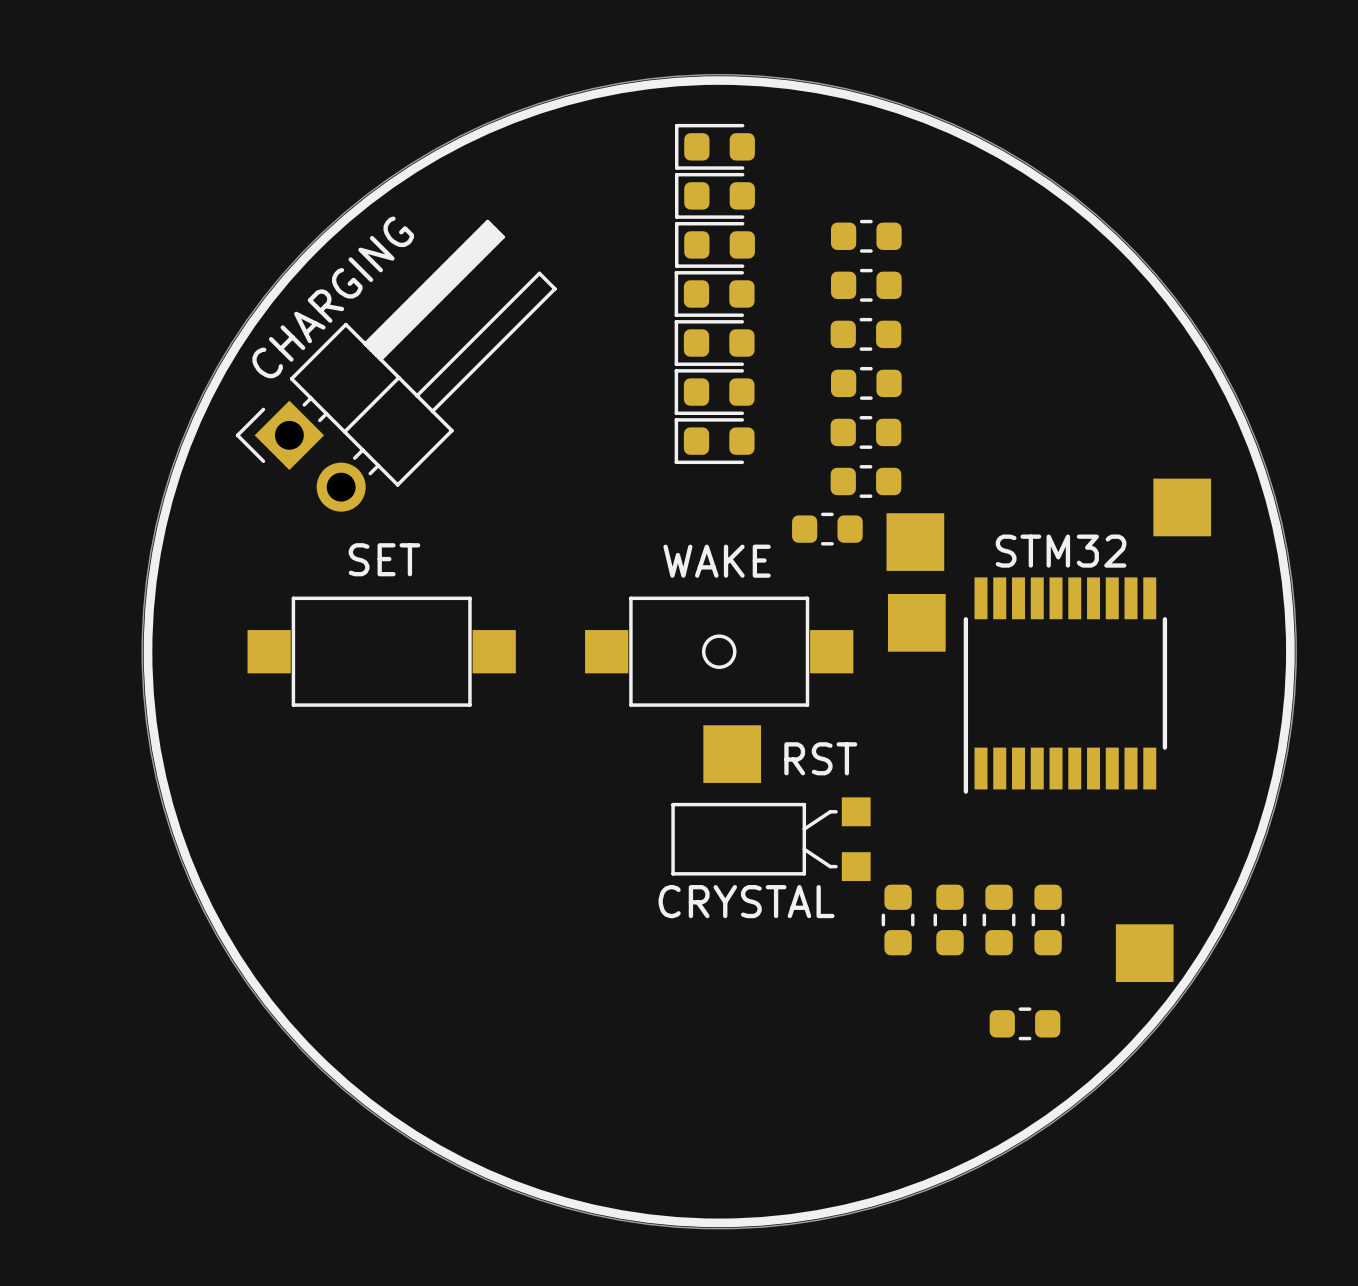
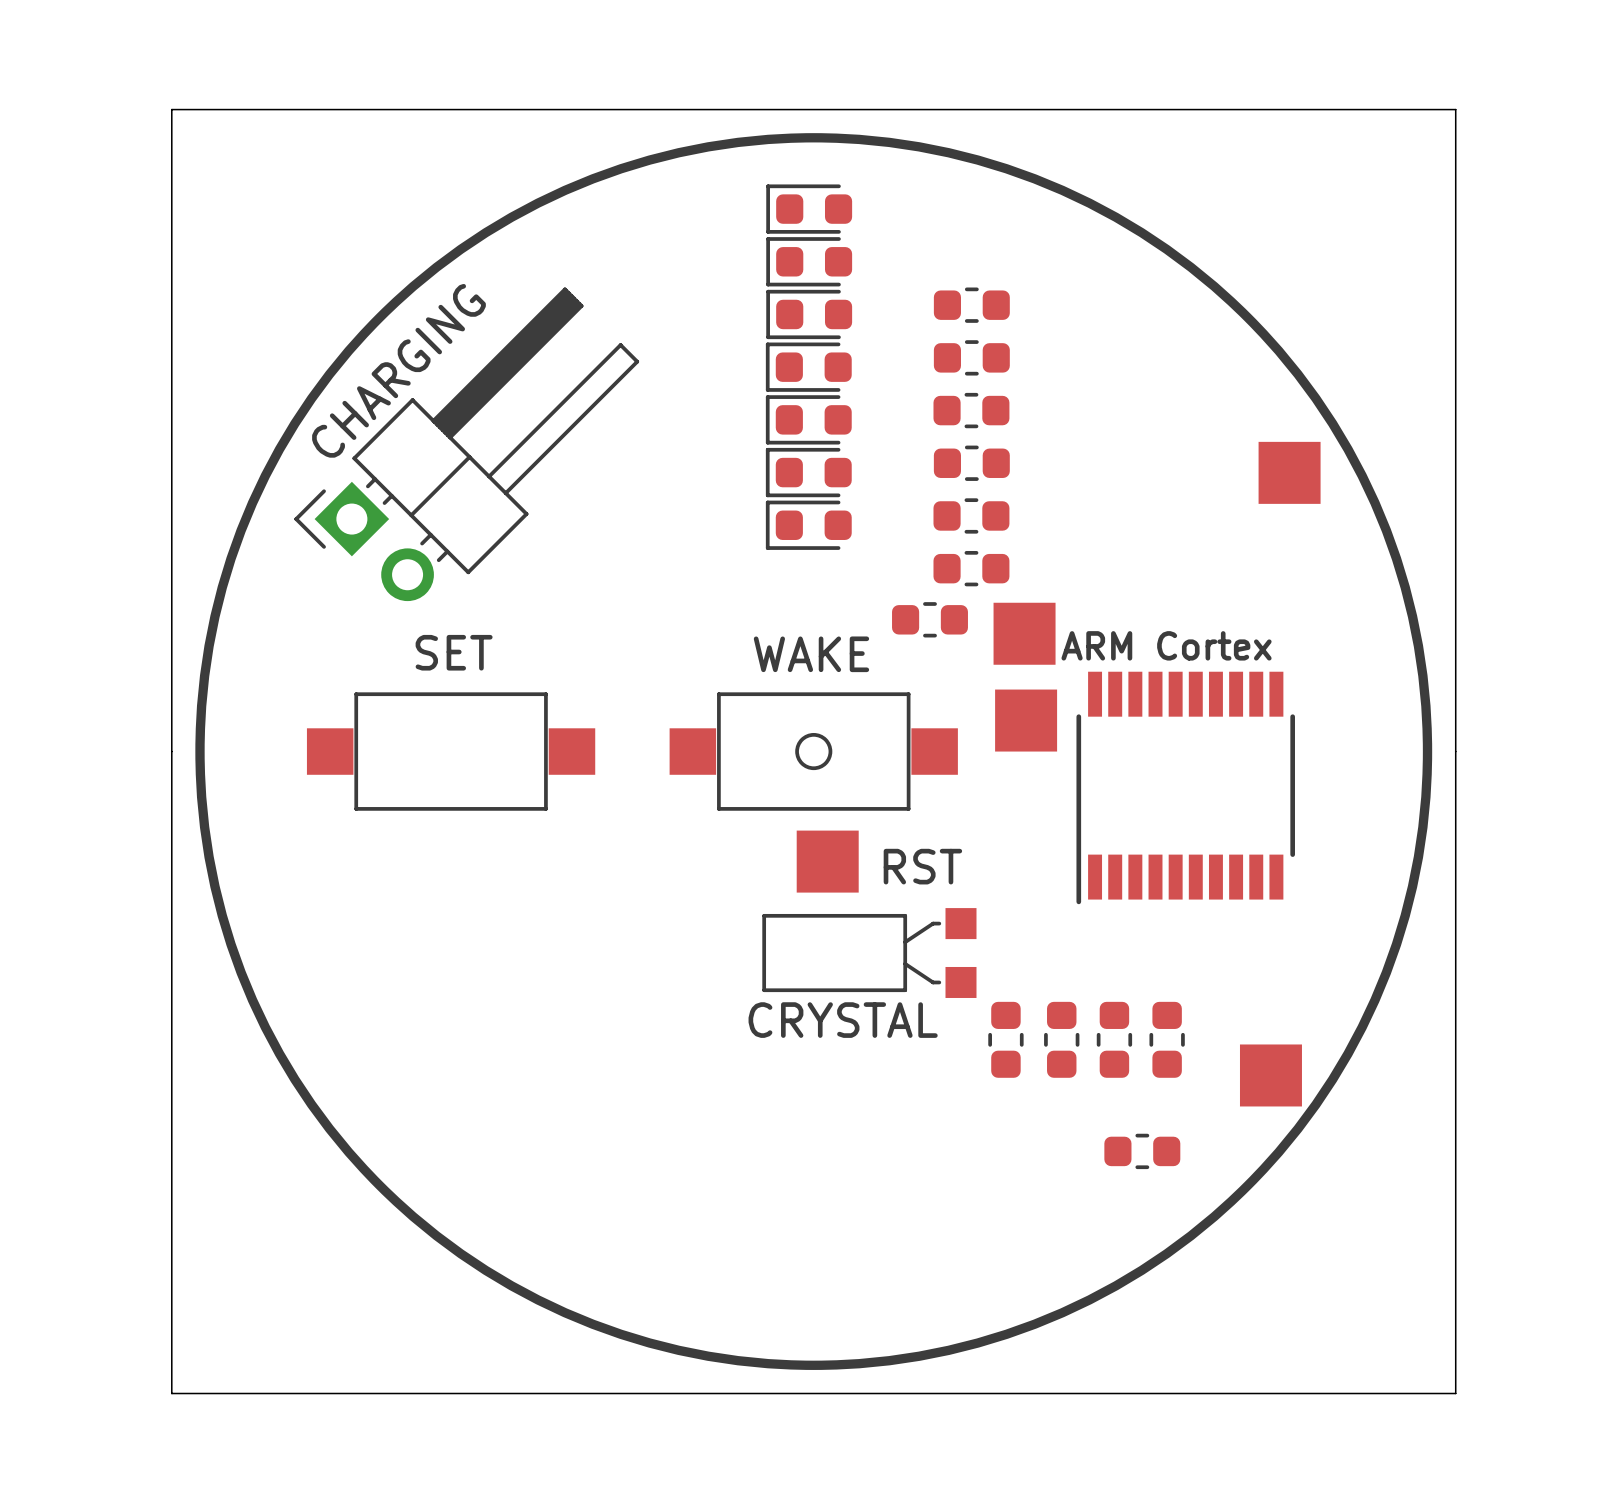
board edge: none -> (171, 109) (171, 1393) (1455, 1393) (1455, 109) (171, 109)
round board edge: [141, 74, 1297, 1230] -> none
part position: (1182, 507) -> (1289, 472)
STM32 name: STM32 (1061, 551) -> ARM Cortex (1166, 645)

